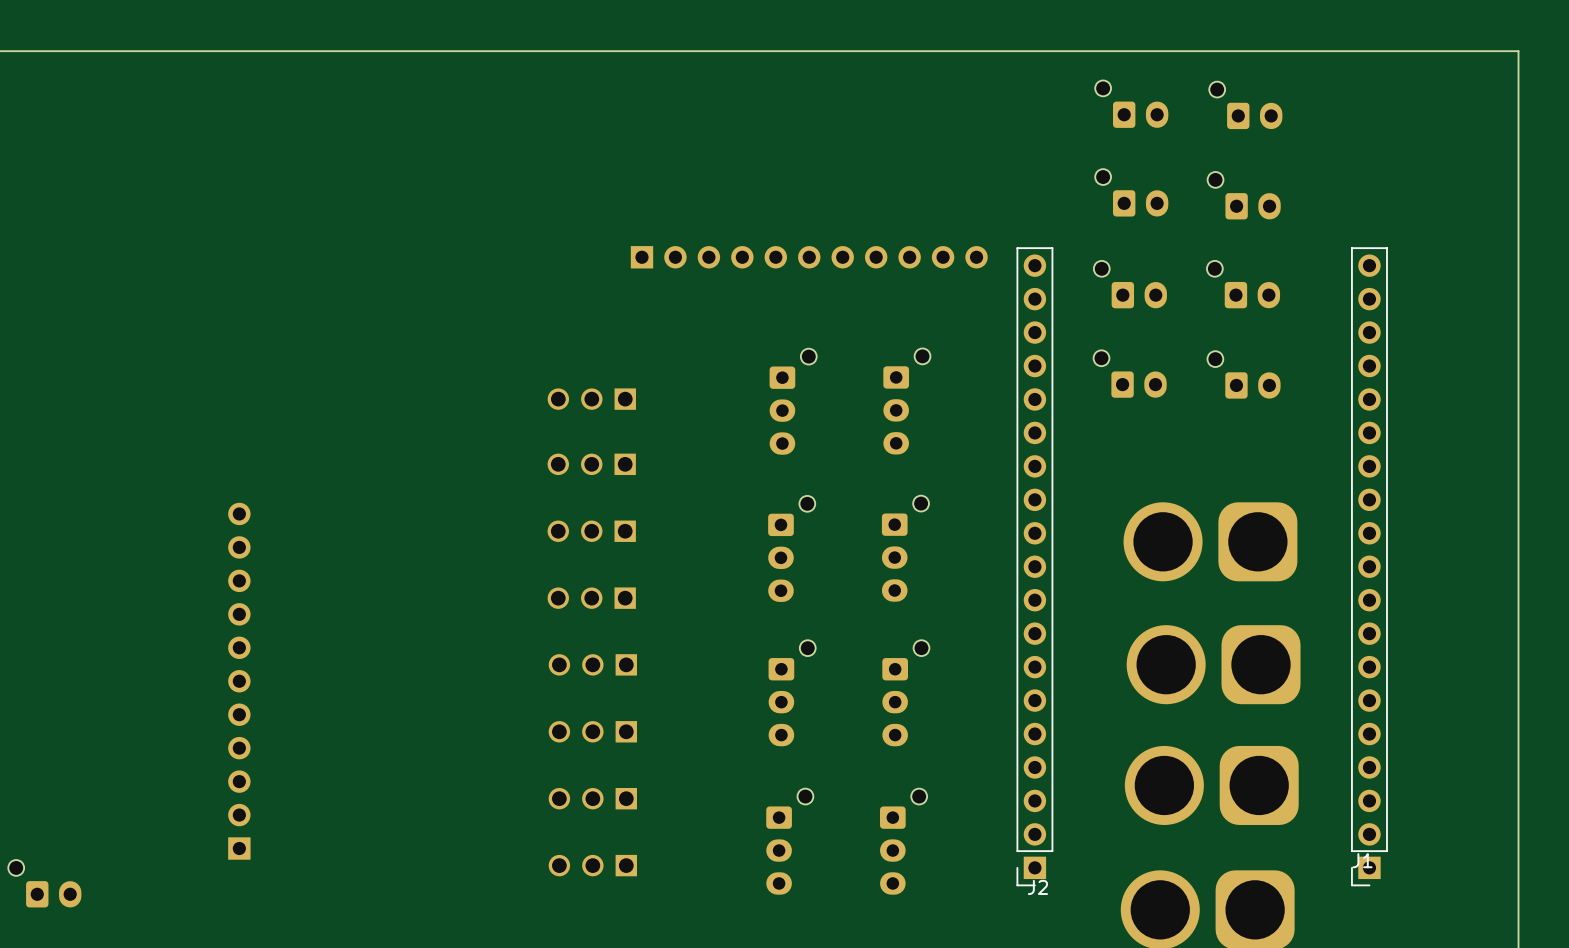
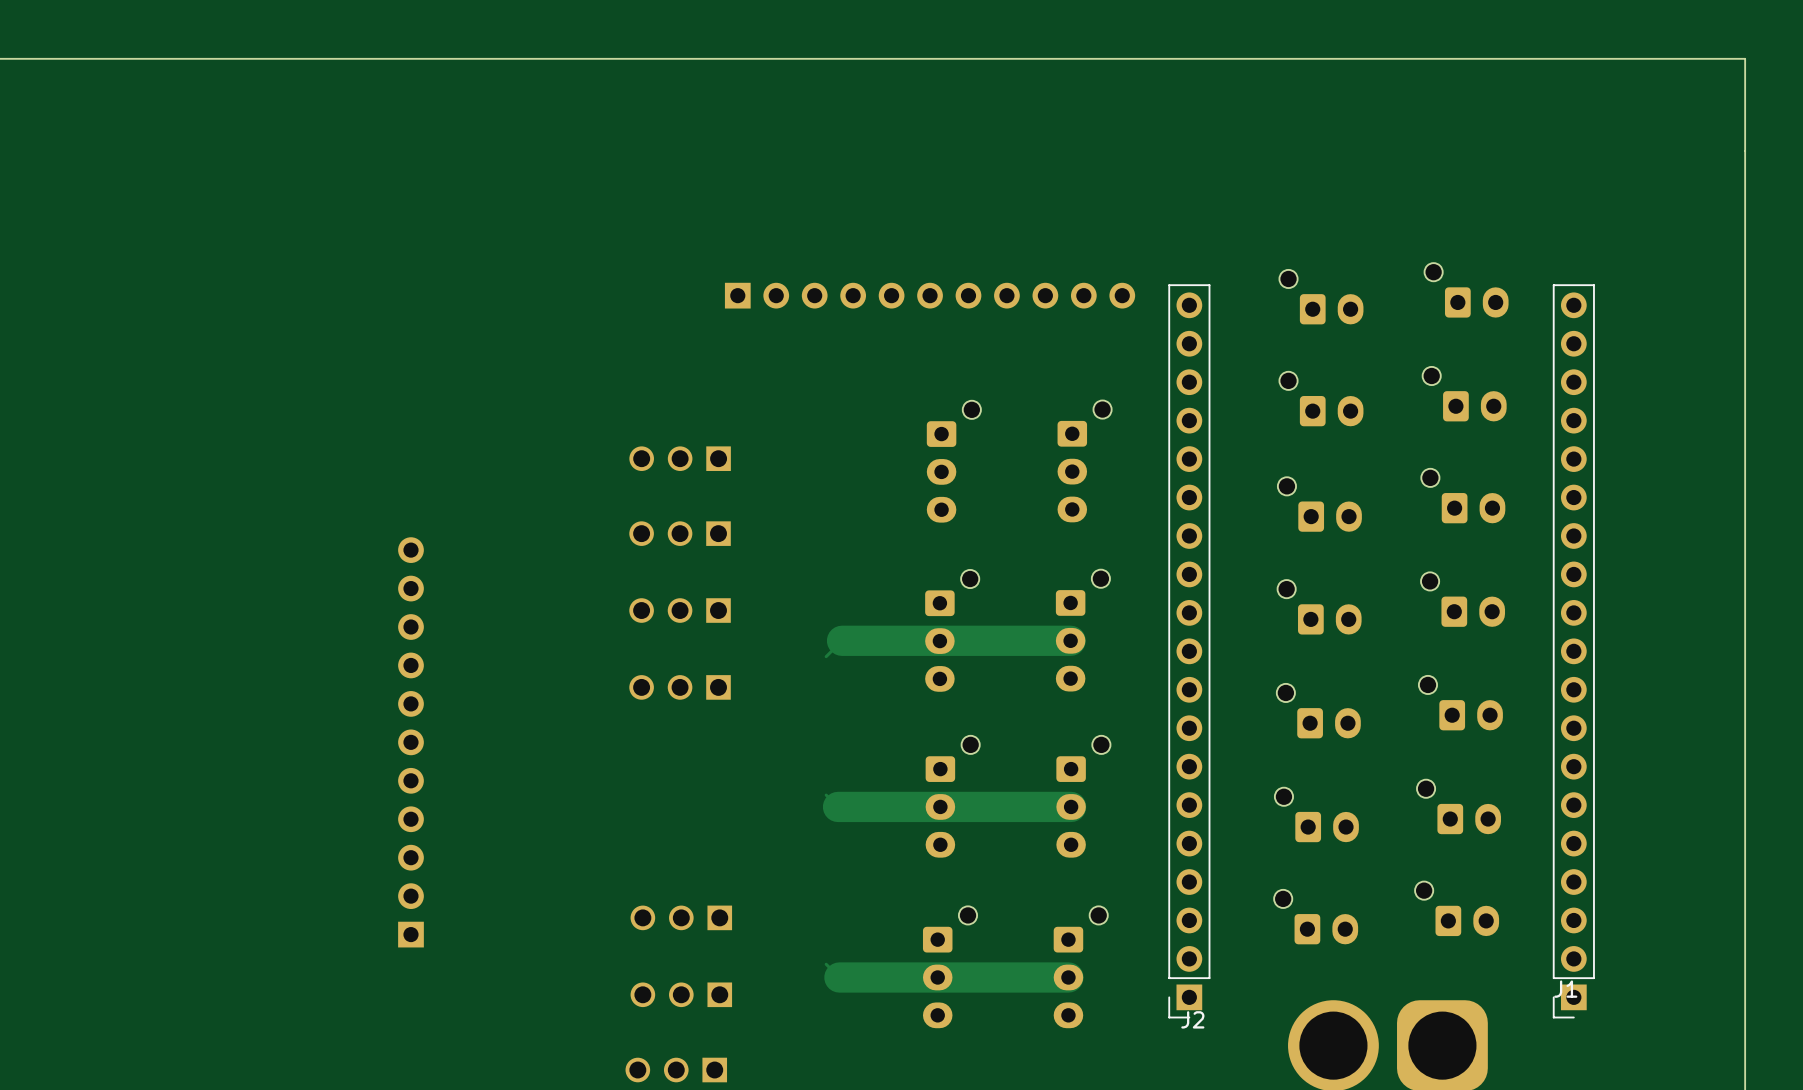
part: (1131, 104) -> none
part: (1245, 105) -> none
part: (1131, 192) -> none
part: (1244, 195) -> none
part: none -> (1466, 290)
part position: (1130, 284) -> (1321, 297)
part: (1243, 284) -> none
part: none -> (1464, 394)
part: none -> (1321, 399)
part: (1130, 374) -> none
part: (1244, 374) -> none
part position: (793, 401) -> (953, 461)
part position: (906, 401) -> (1084, 461)
part: none -> (1463, 496)
part: none -> (1319, 504)
part: none -> (1463, 599)
part: none -> (1319, 607)
part: (1210, 541) -> none
part position: (791, 548) -> (952, 630)
part position: (905, 548) -> (1082, 630)
track: none -> (1070, 640) (842, 640) (826, 656)
part: none -> (1460, 703)
part: none -> (1318, 711)
part: (592, 664) -> none
part: (1213, 664) -> none
part position: (239, 681) -> (410, 742)
track: none -> (826, 795) (838, 806) (1071, 806)
part position: (792, 693) -> (952, 796)
part position: (905, 693) -> (1083, 796)
part: none -> (1458, 806)
part: none -> (1316, 814)
part: (592, 731) -> none
part: (1211, 785) -> none
part: none -> (1457, 908)
part: none -> (1316, 917)
track: none -> (826, 964) (839, 977) (1068, 977)
part position: (789, 841) -> (950, 967)
part position: (903, 841) -> (1080, 967)
part: (44, 883) -> none
part: none -> (676, 1070)

